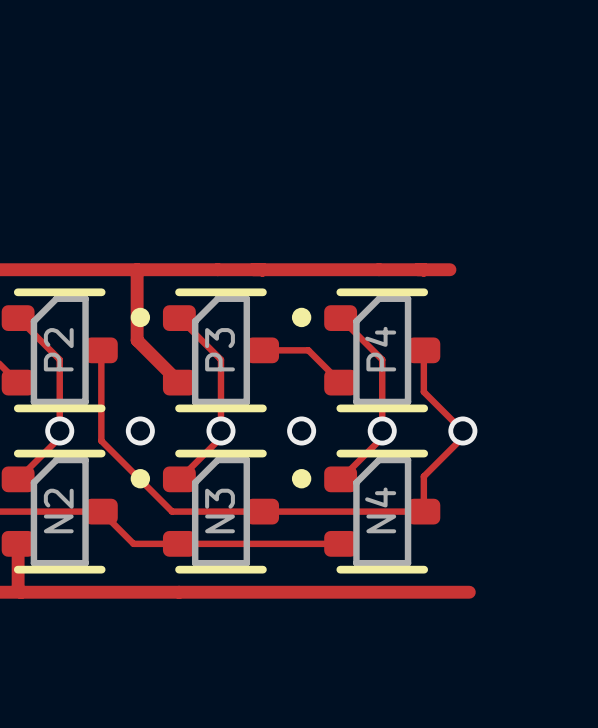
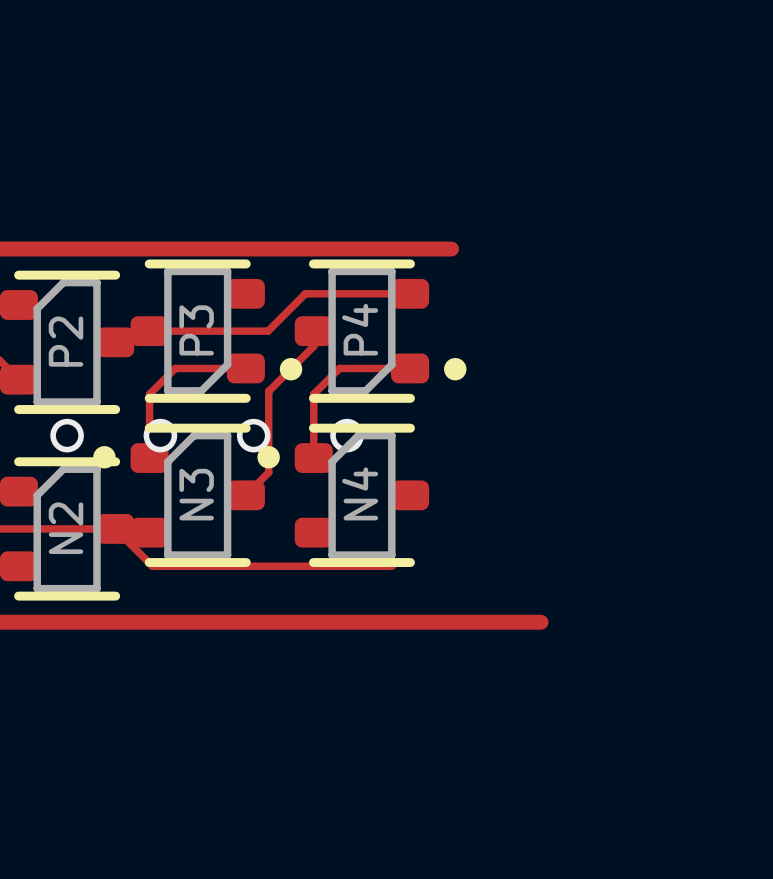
track: (137, 269) (137, 340) (179, 382) -> none
track: (391, 269) (449, 269) -> none
track: none -> (410, 293) (305, 293) (268, 331) (149, 331)
track: (18, 318) (59, 359) (59, 437) (18, 479) -> none
track: (179, 318) (220, 359) (220, 437) (179, 479) -> none
track: (340, 318) (382, 359) (382, 437) (340, 479) -> none
track: none -> (313, 331) (313, 346) (268, 391) (268, 472) (245, 495)
track: (101, 350) (101, 440) (172, 511) (423, 511) (423, 476) (462, 437) (462, 430) (423, 391) (423, 350) -> none
P3 rotation: 0° (204, 350) -> 180° (216, 331)
track: (262, 350) (308, 350) (340, 382) -> none
P4 rotation: 0° (366, 350) -> 180° (380, 331)
track: none -> (245, 368) (175, 368) (149, 394) (149, 458)
track: none -> (410, 368) (339, 368) (313, 394) (313, 458)
via: (382, 430) -> none
via: (462, 430) -> none
N3 position: (204, 511) -> (179, 495)
N4 position: (366, 511) -> (343, 495)
track: (18, 543) (18, 589) (21, 592) -> none

